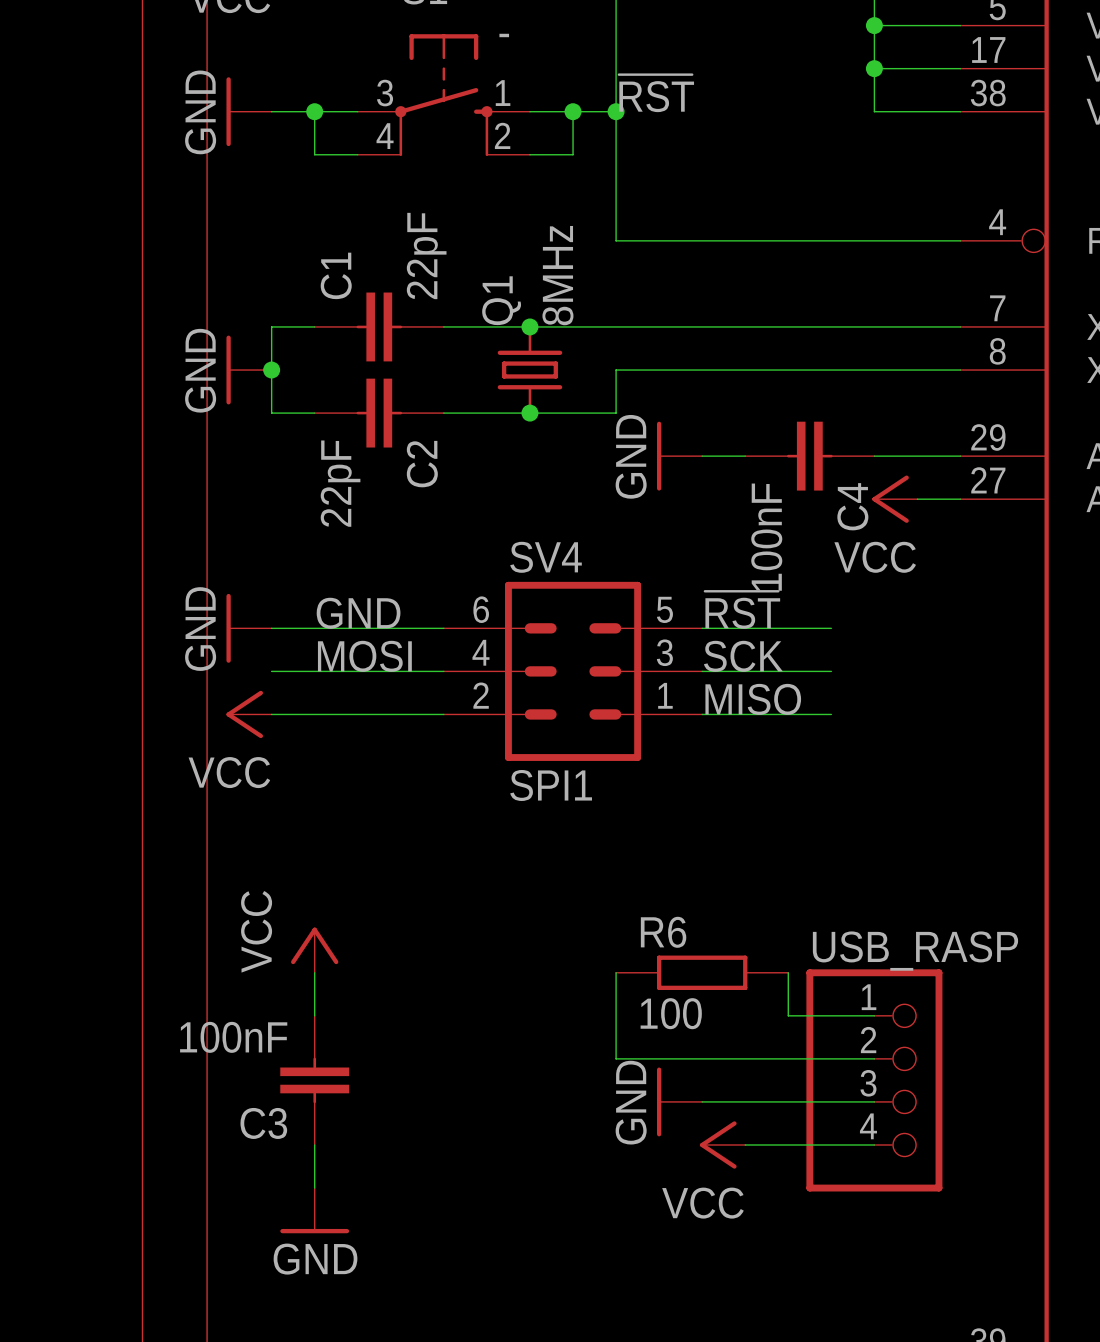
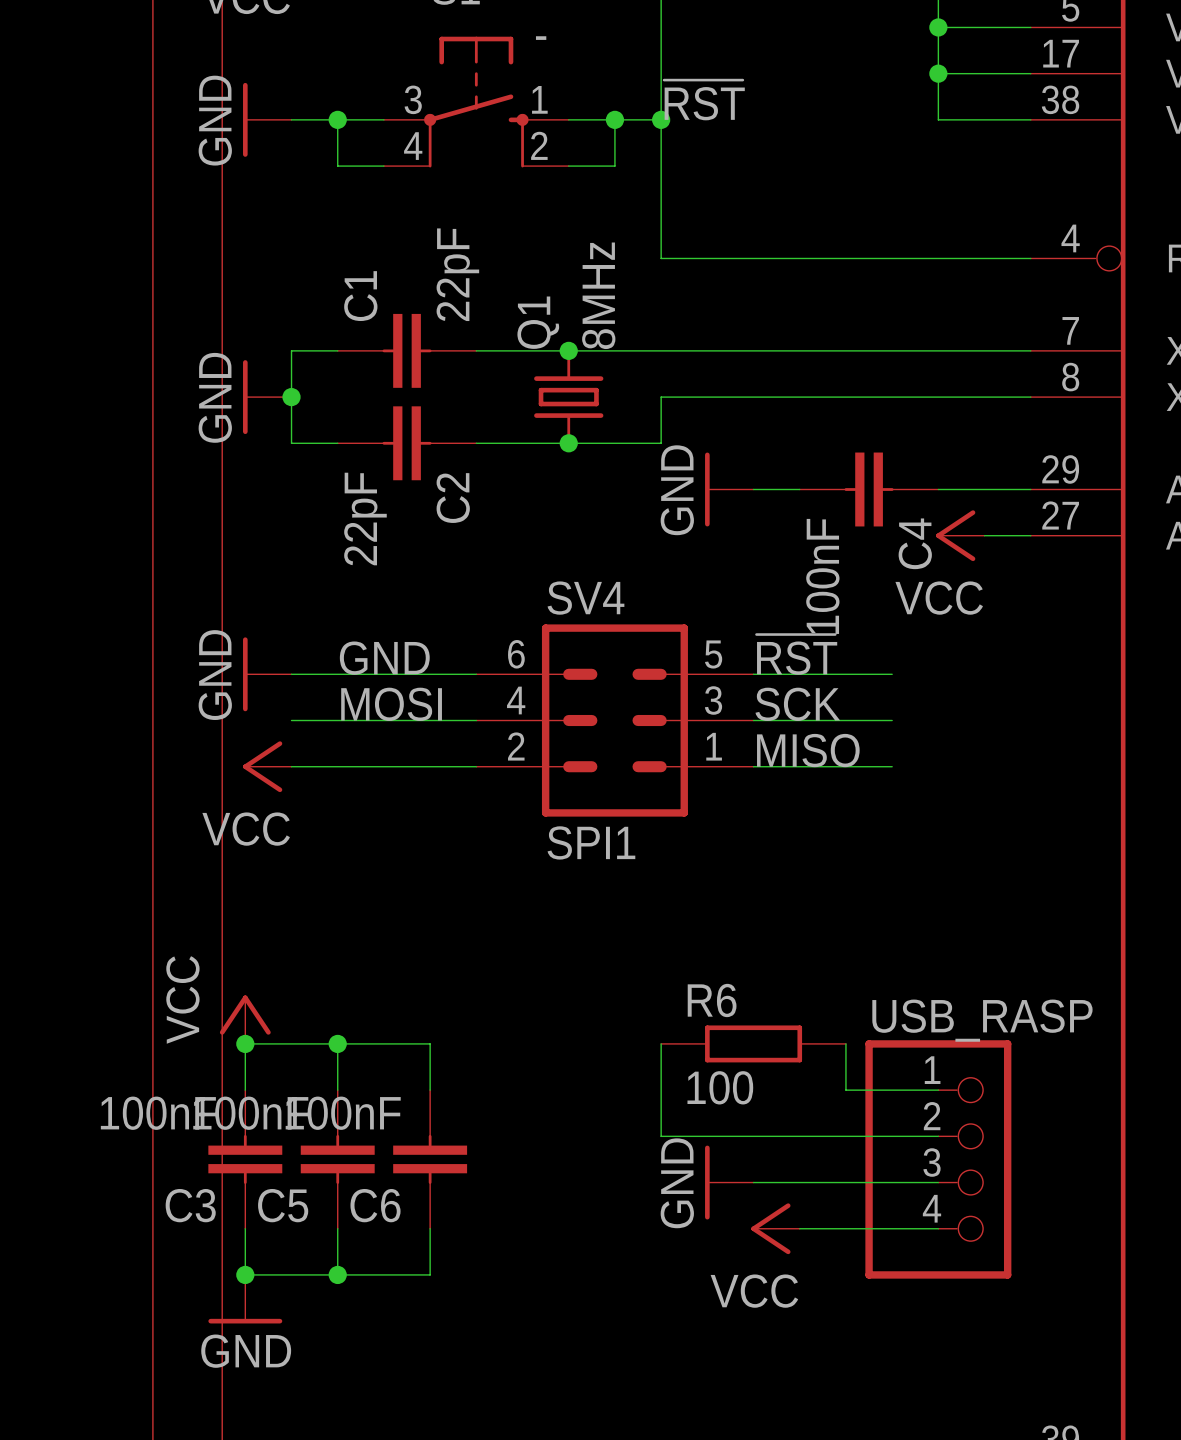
power symbol position: VCC (314, 950) -> VCC (245, 1019)
junction: none -> (245, 1043)
junction: none -> (337, 1043)
wire: none -> (245, 1090) (245, 1043) (430, 1043) (430, 1090)
C3: none -> 100nF (245, 1159)
C6: none -> 100nF (430, 1159)
C3 name: C3 (263, 1123) -> C5 (283, 1205)
wire: none -> (245, 1228) (245, 1274) (430, 1274) (430, 1228)
junction: none -> (245, 1274)
junction: none -> (337, 1274)
power symbol position: GND (314, 1210) -> GND (245, 1299)

